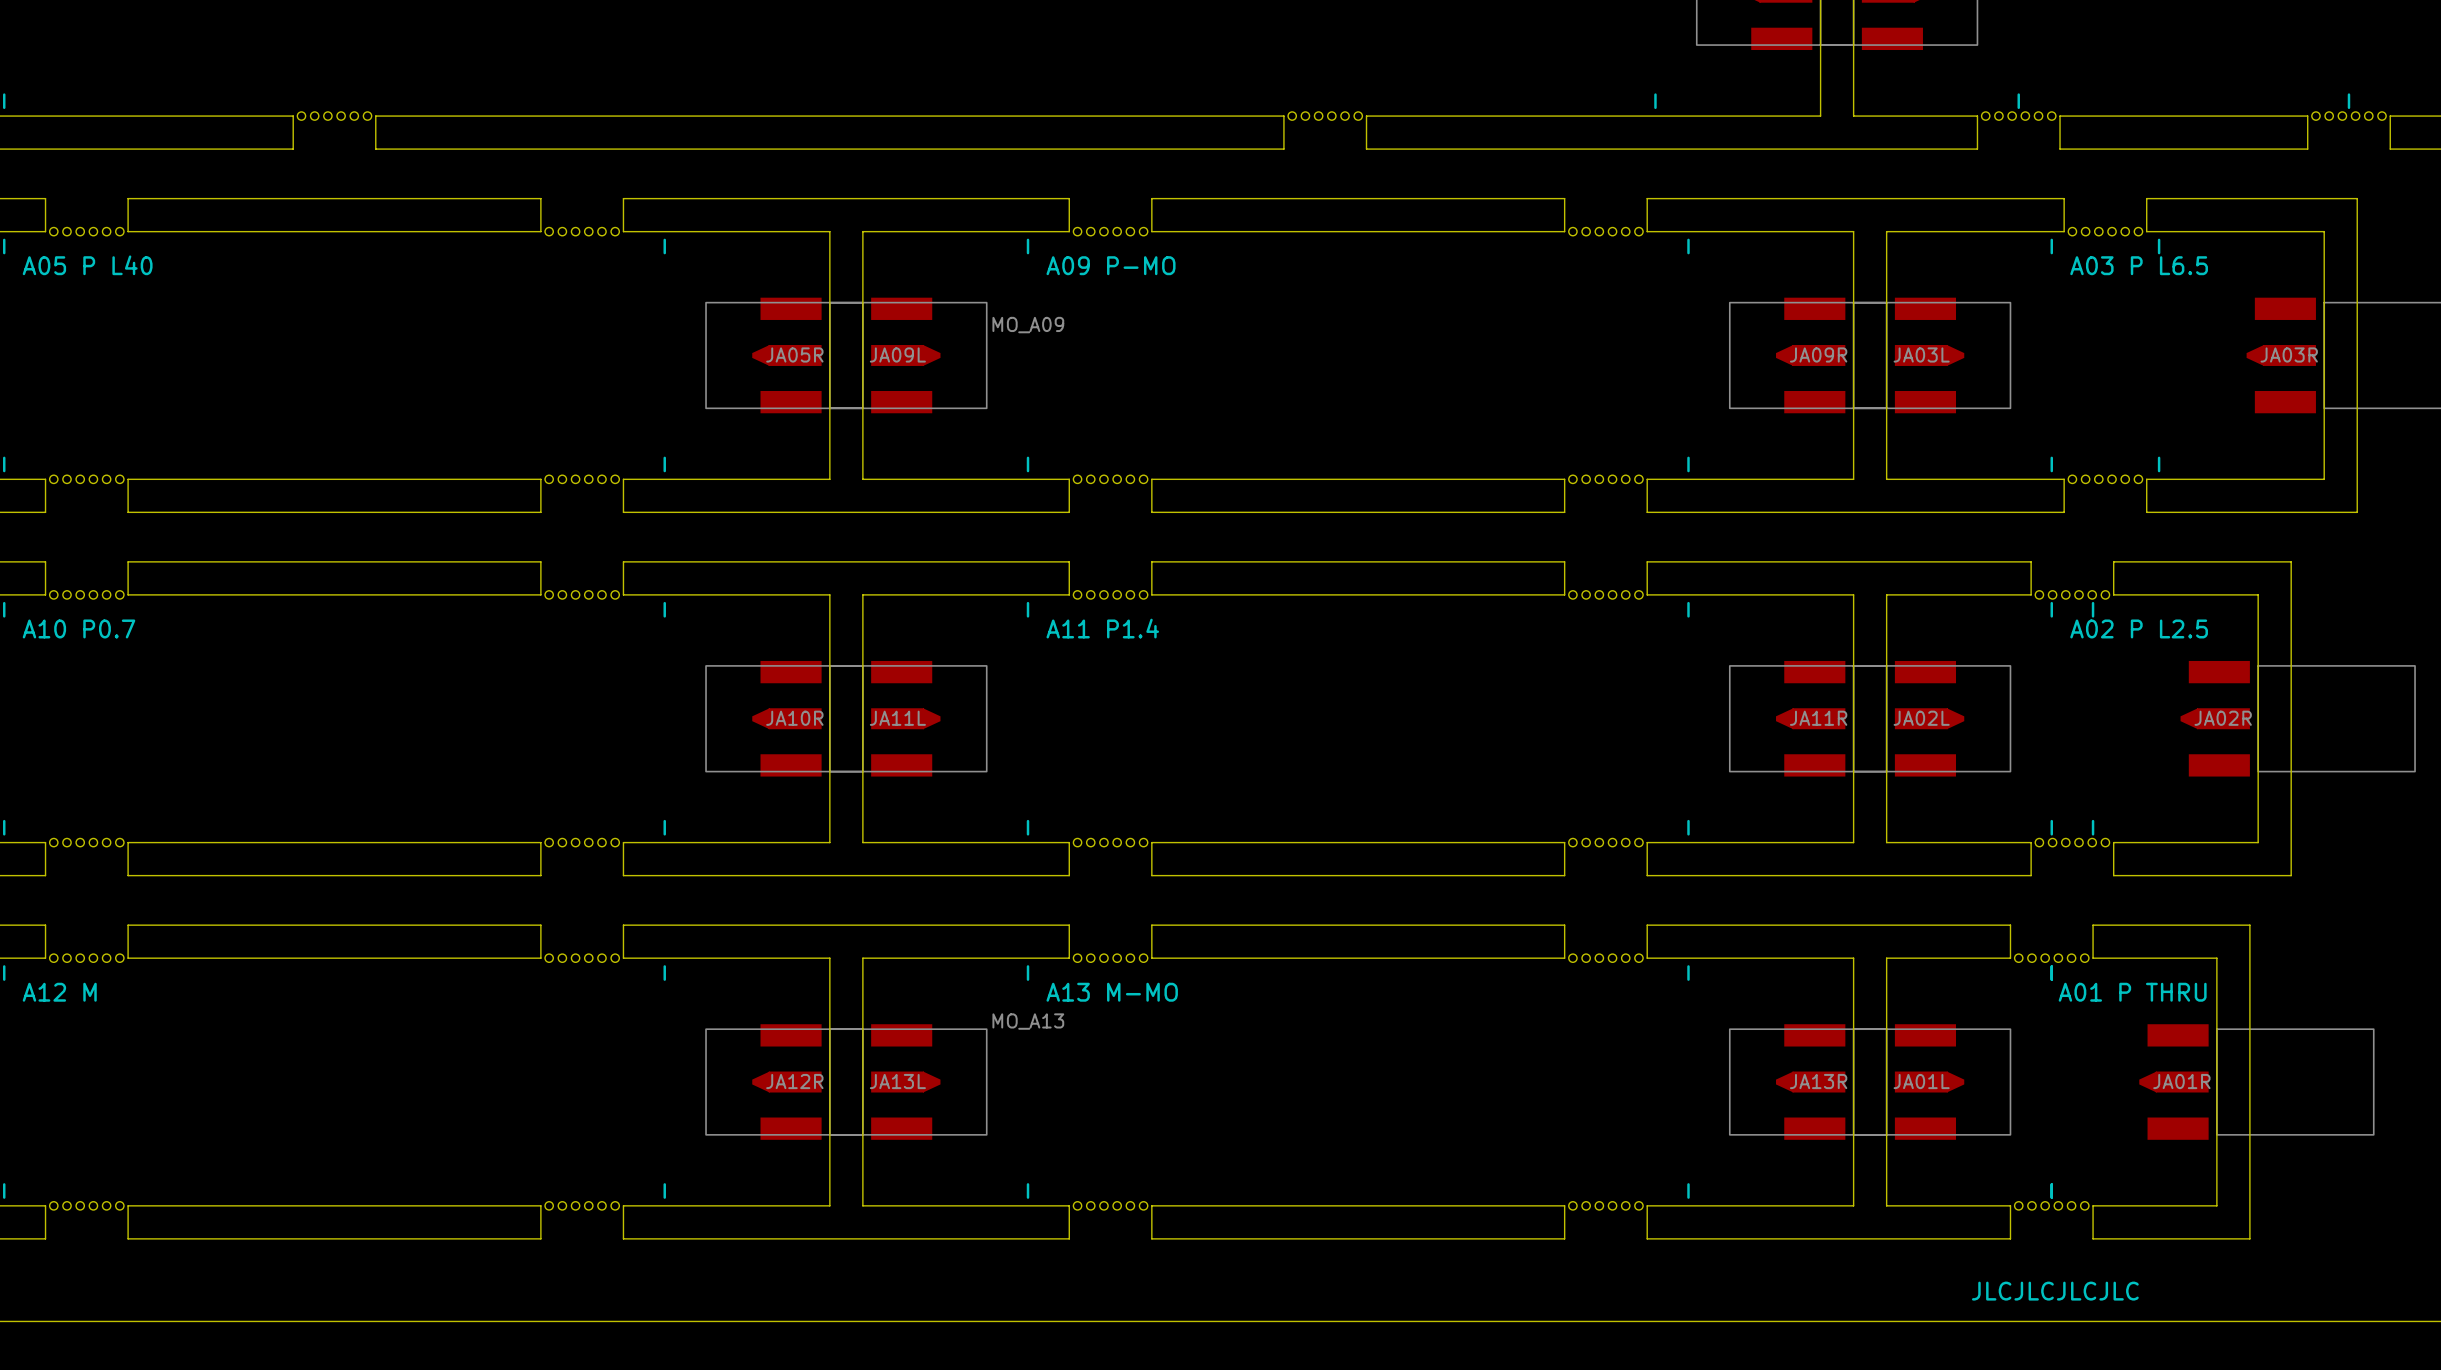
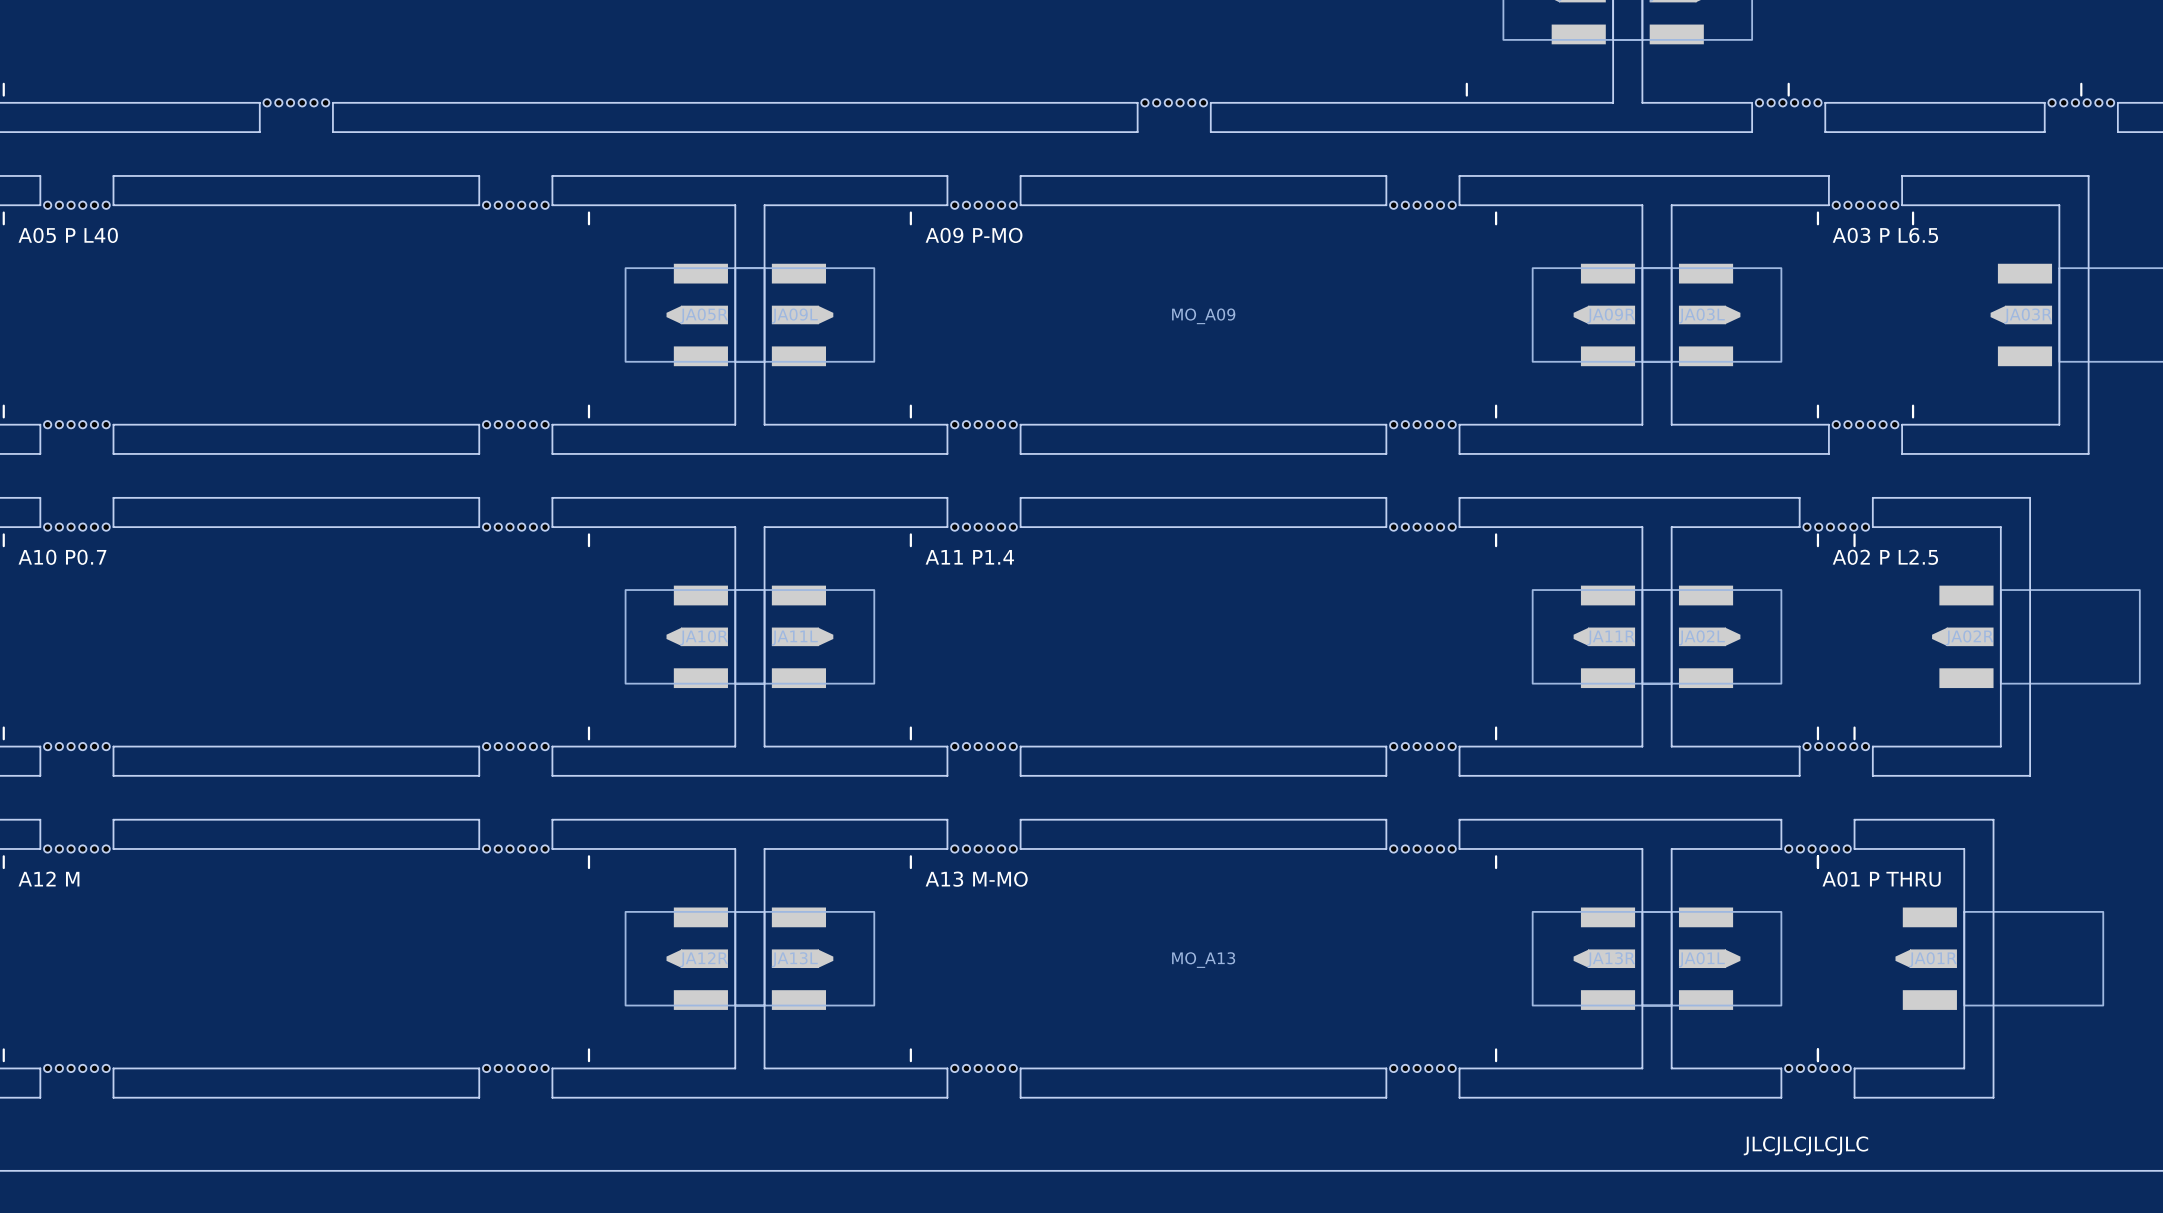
MO_A09 position: (1028, 325) -> (1203, 316)
MO_A13 position: (1028, 1021) -> (1203, 960)

